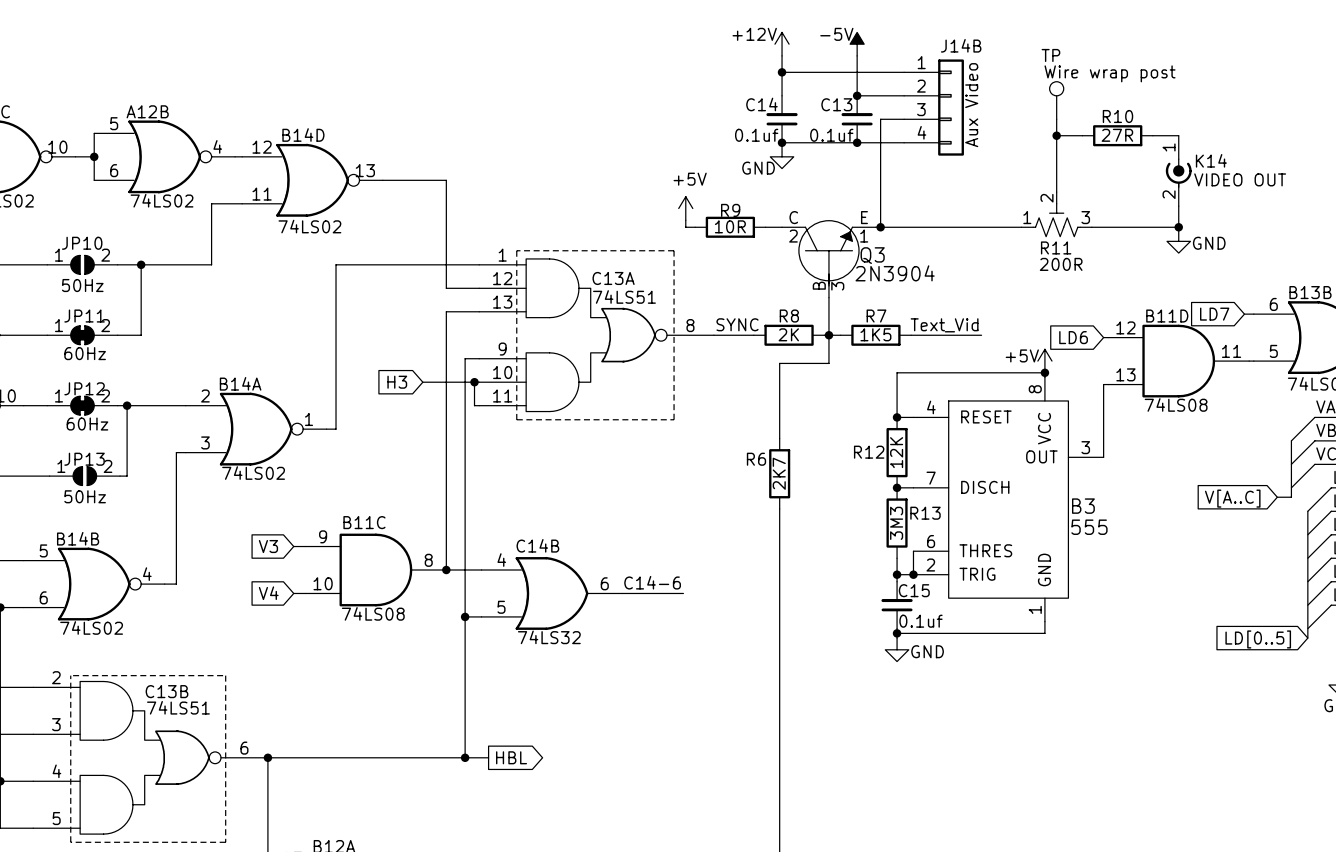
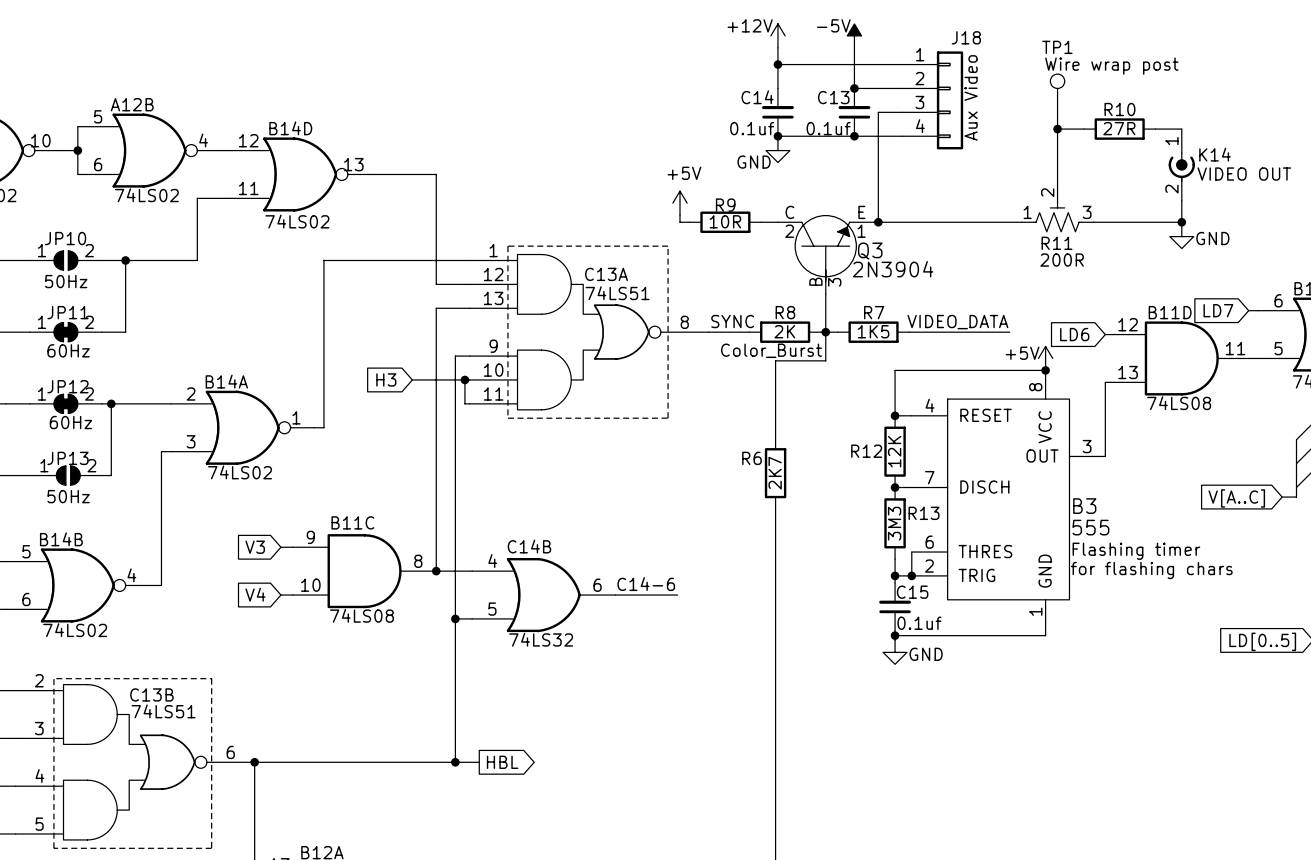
J14B name: J14B (961, 45) -> J18 (966, 37)
TP name: TP (1050, 55) -> TP1 (1057, 47)
label: Text_Vid (944, 325) -> none
label: none -> VIDEO_DATA (957, 322)
wire: none -> (981, 332) (1009, 332)
label: none -> Color_Burst (771, 350)
text: none -> Flashing timer (1136, 551)
text: none -> for flashing chars (1151, 570)

